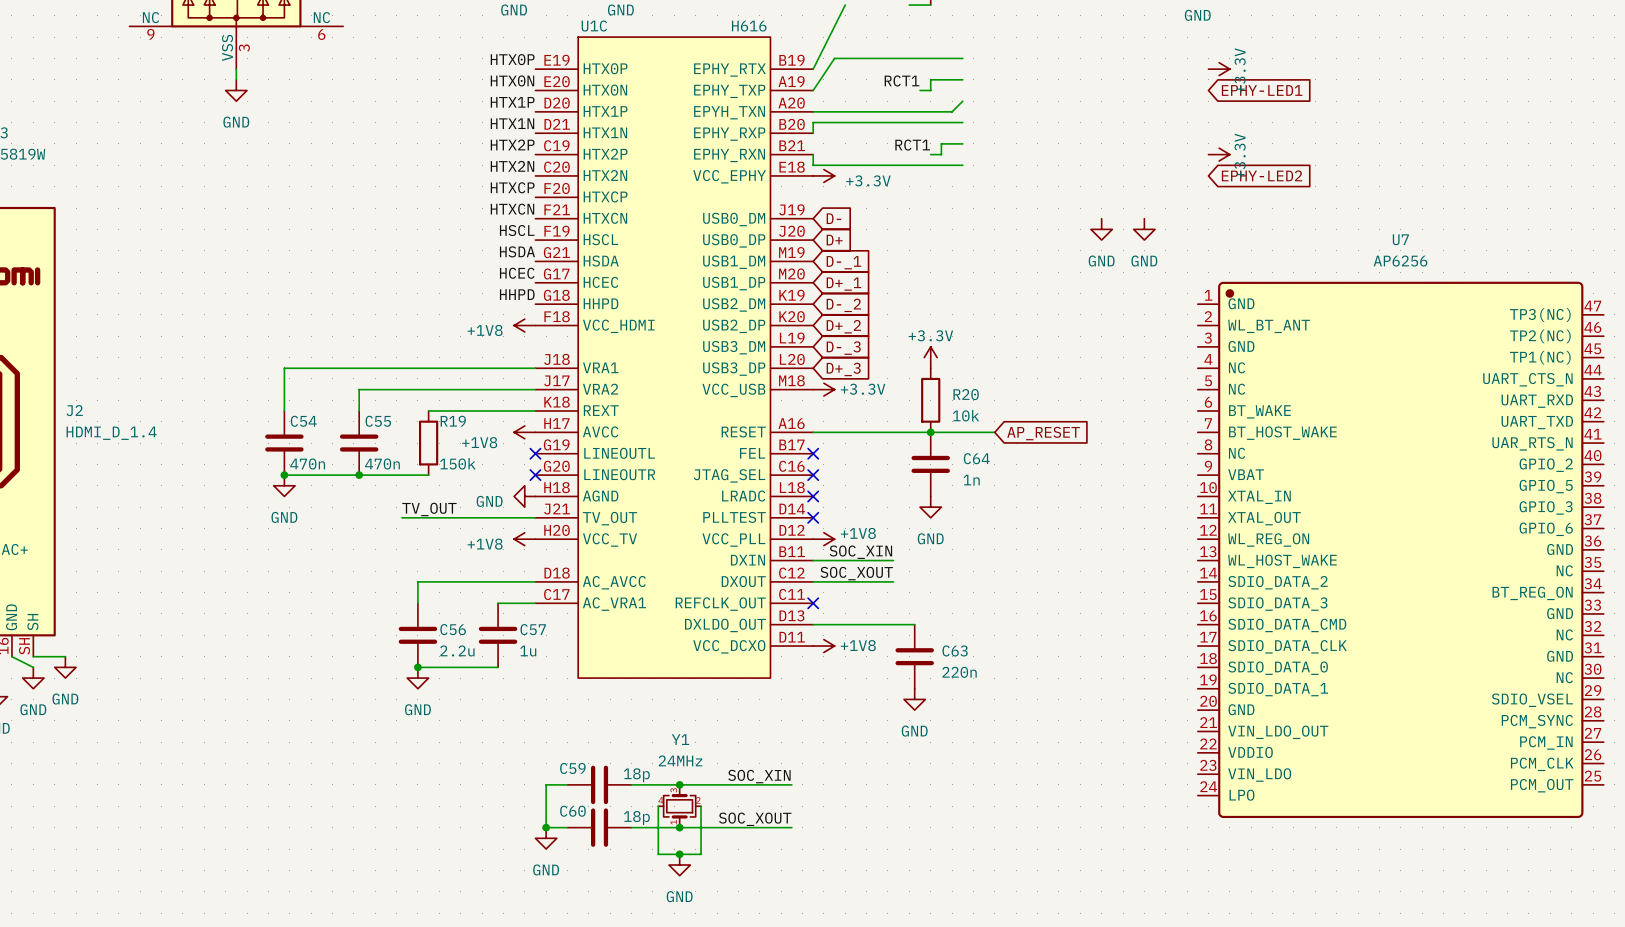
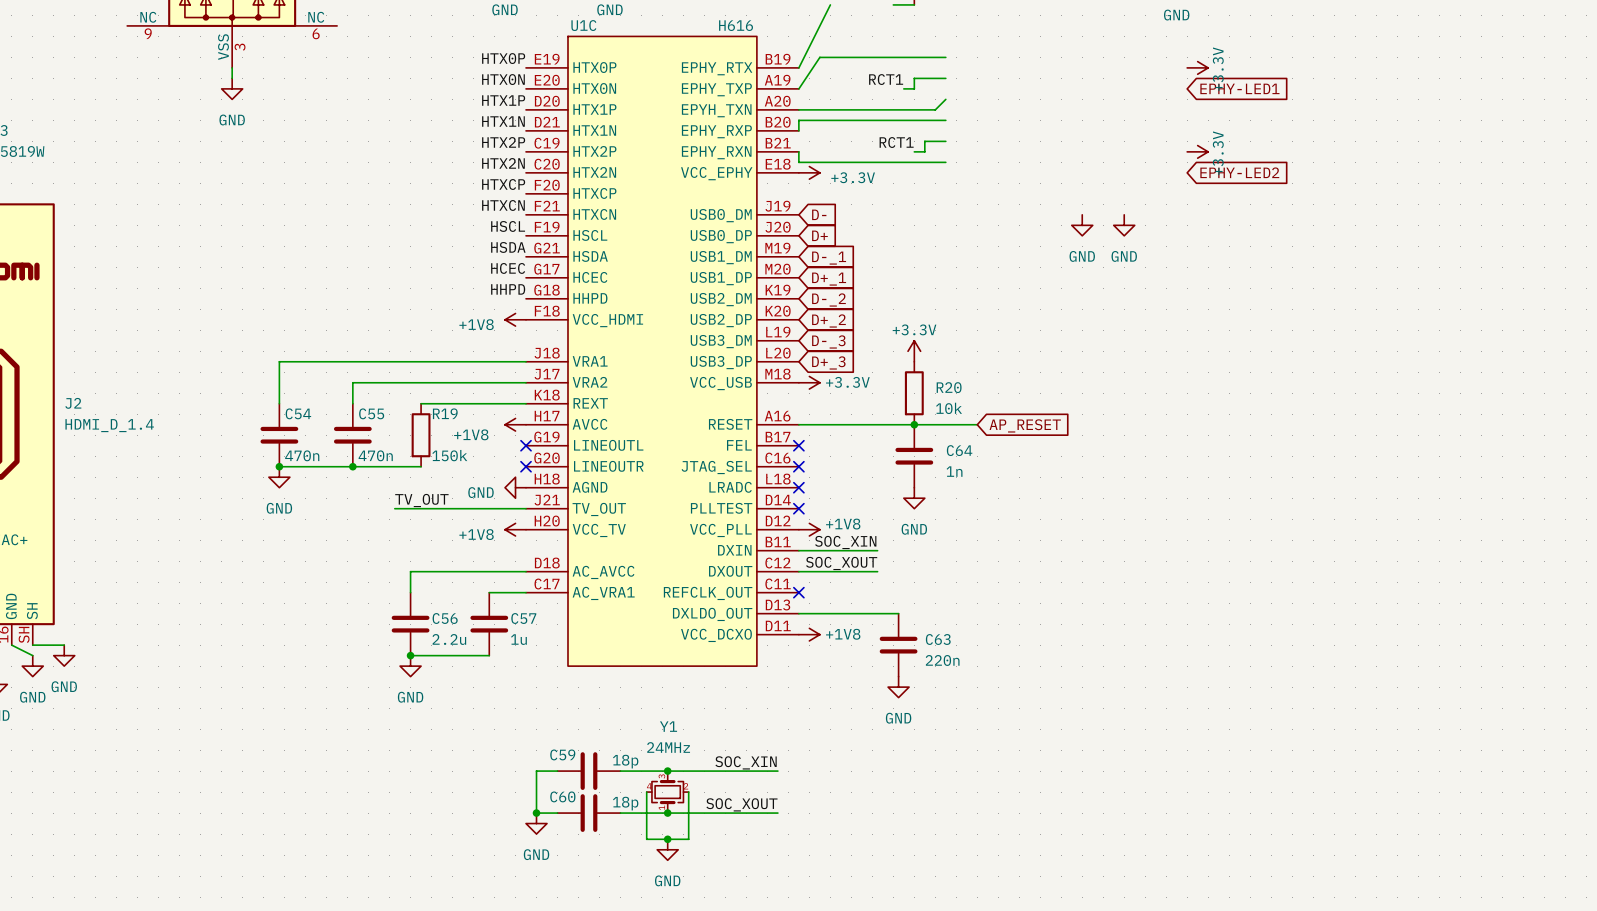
U7: AP6256 (1400, 549) -> none

